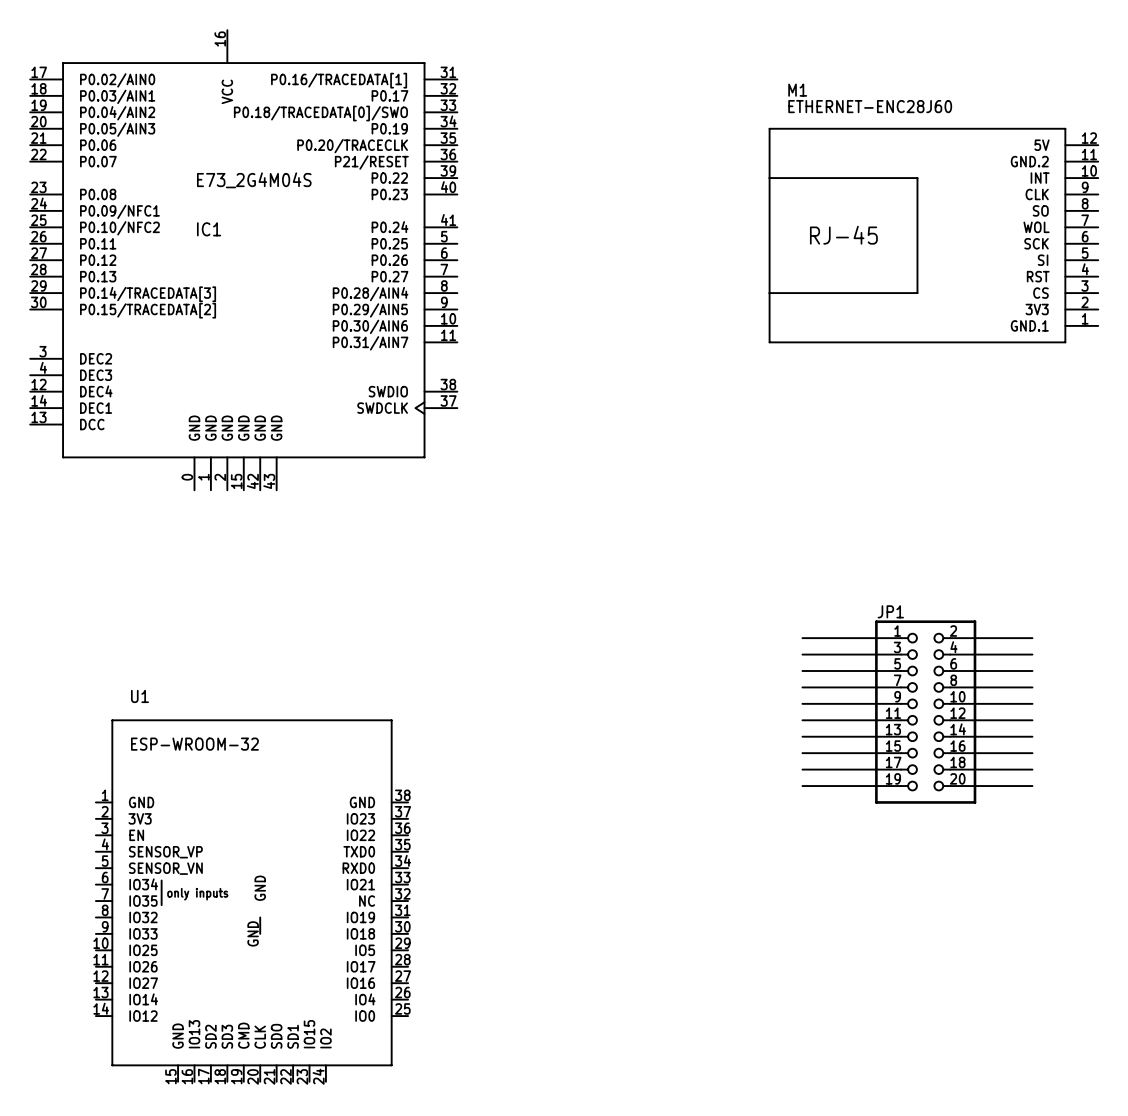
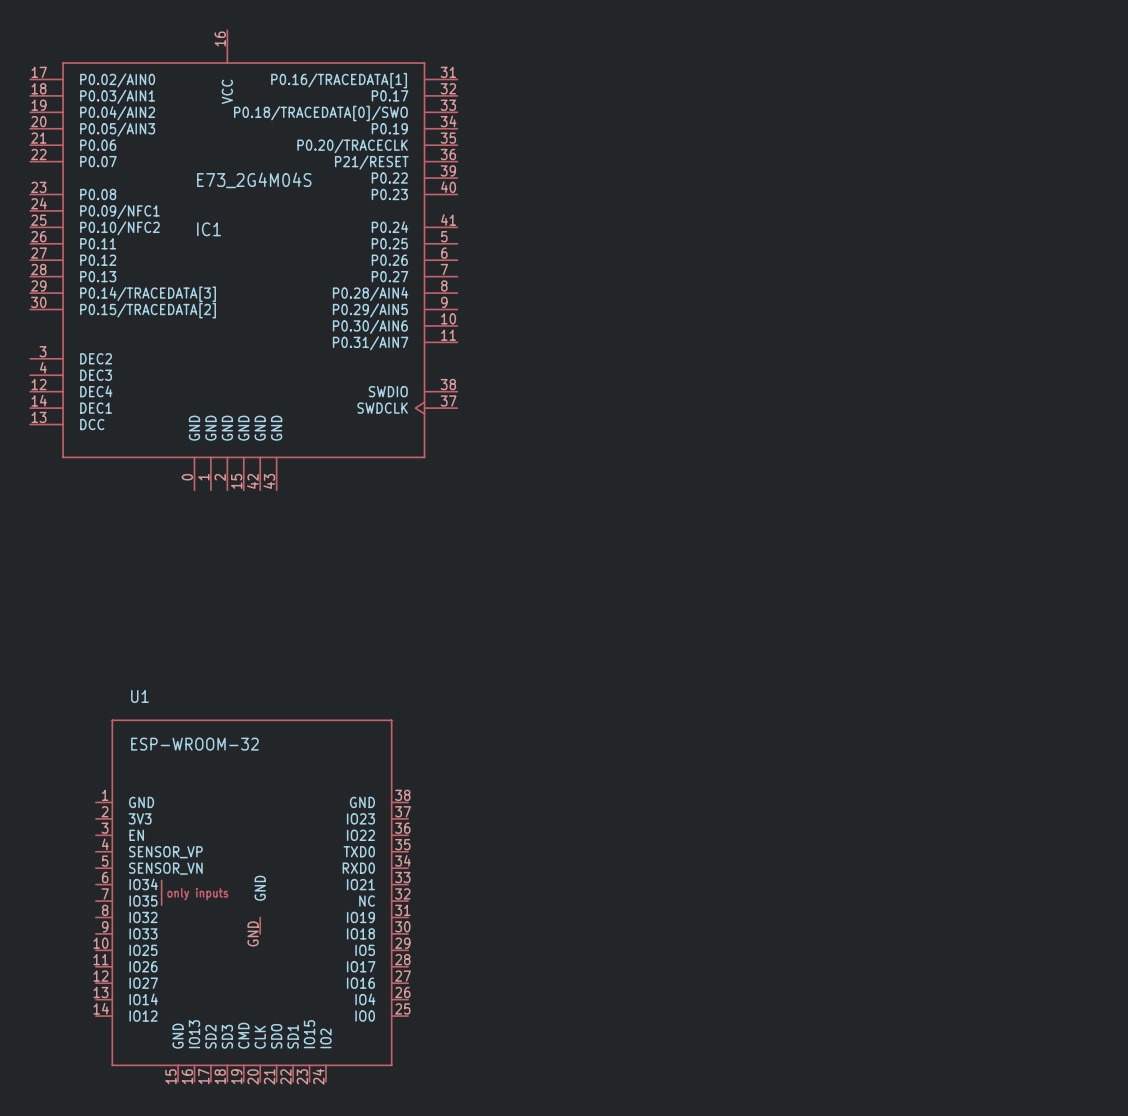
M1: ETHERNET-ENC28J60 (933, 235) -> none
wire: (802, 638) (901, 638) -> none
wire: (950, 638) (1032, 638) -> none
wire: (802, 654) (901, 654) -> none
wire: (950, 654) (1032, 654) -> none
wire: (802, 671) (901, 671) -> none
wire: (950, 671) (1032, 671) -> none
wire: (802, 687) (901, 687) -> none
wire: (950, 687) (1032, 687) -> none
wire: (802, 703) (901, 703) -> none
wire: (950, 703) (1032, 703) -> none
JP1: (925, 712) -> none
wire: (802, 720) (901, 720) -> none
wire: (950, 720) (1032, 720) -> none
wire: (802, 736) (901, 736) -> none
wire: (950, 736) (1032, 736) -> none
wire: (802, 753) (901, 753) -> none
wire: (950, 753) (1032, 753) -> none
wire: (802, 769) (901, 769) -> none
wire: (950, 769) (1032, 769) -> none
wire: (802, 786) (901, 786) -> none
wire: (950, 786) (1032, 786) -> none

